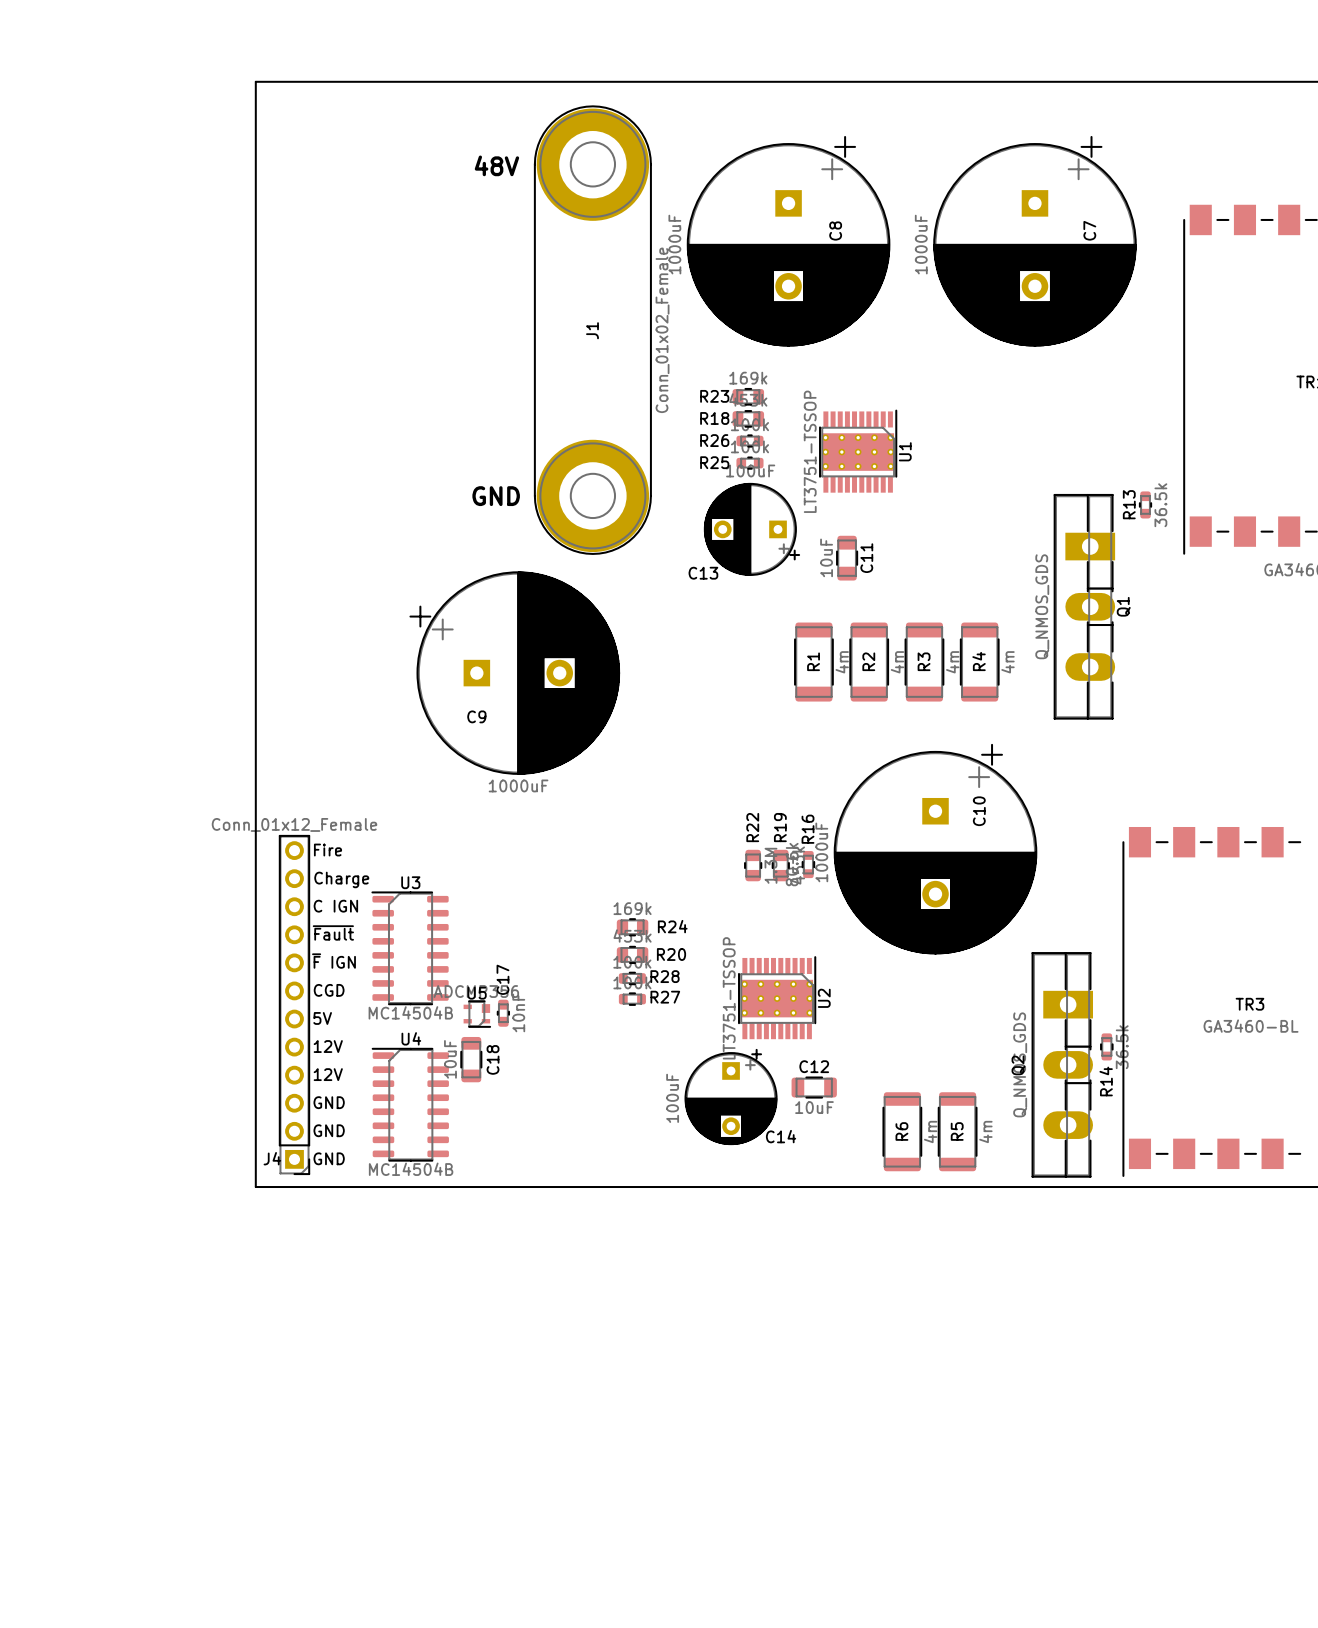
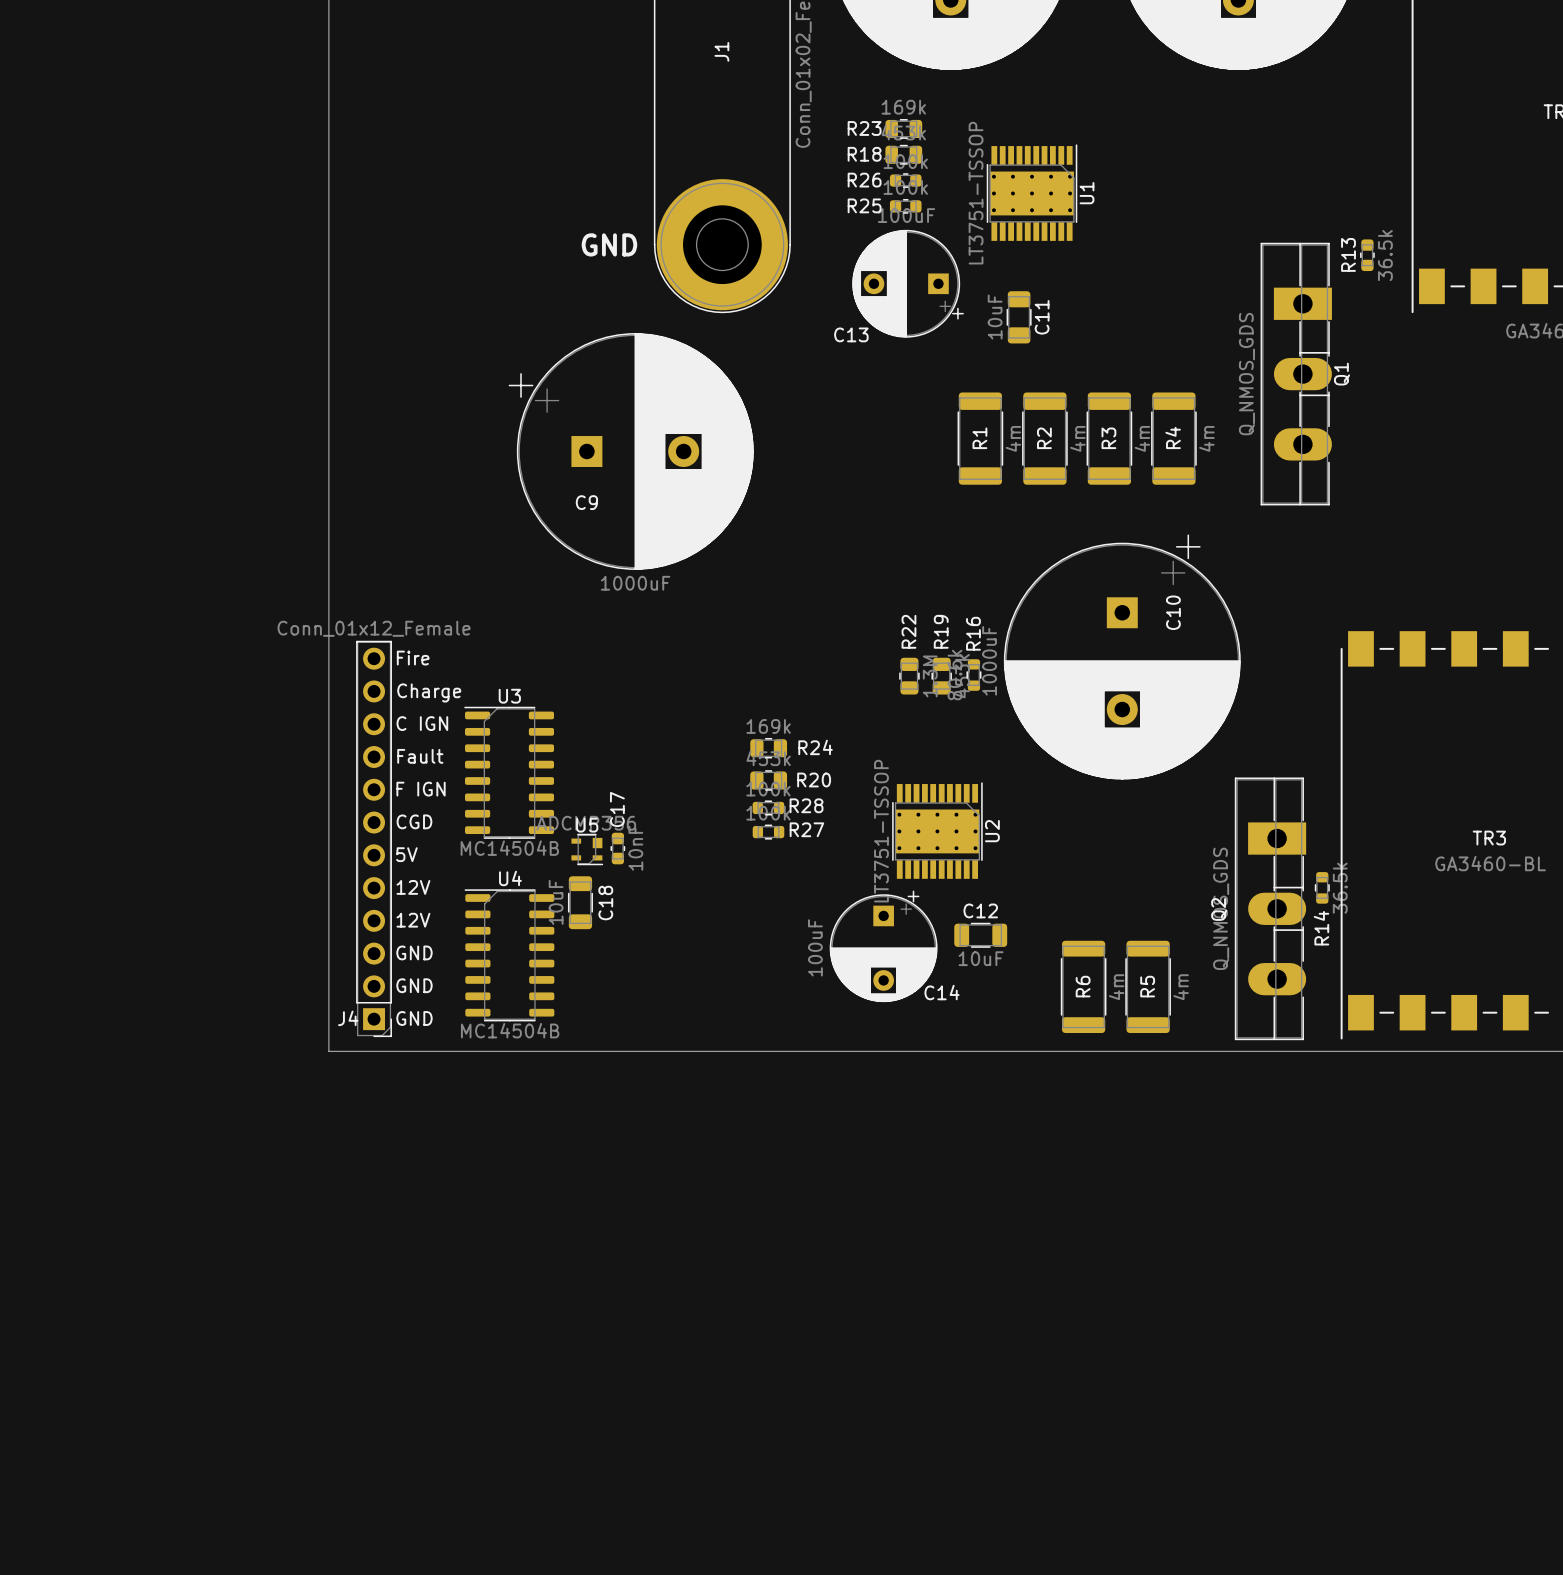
text: ~{Fault} (333, 932) -> Fault (420, 756)
text: ~{F} IGN (333, 961) -> F IGN (421, 789)

